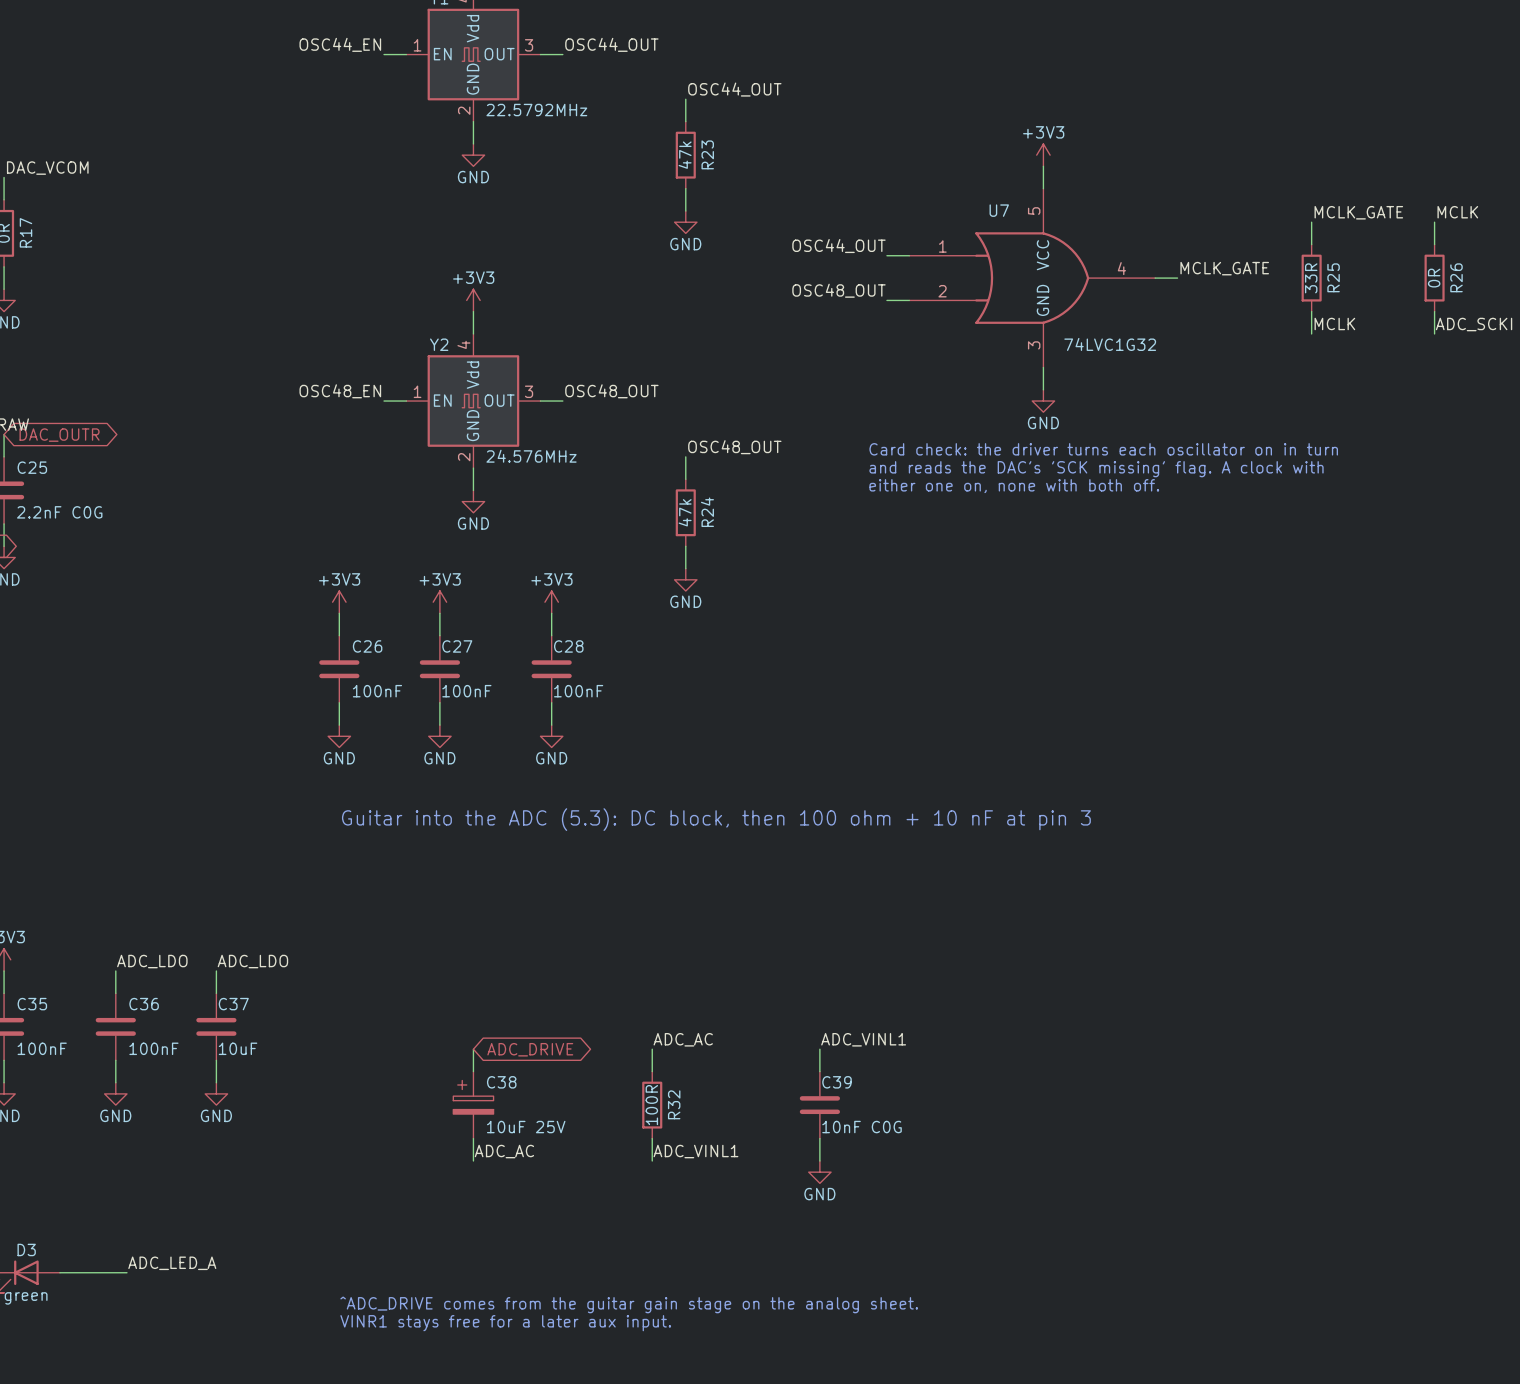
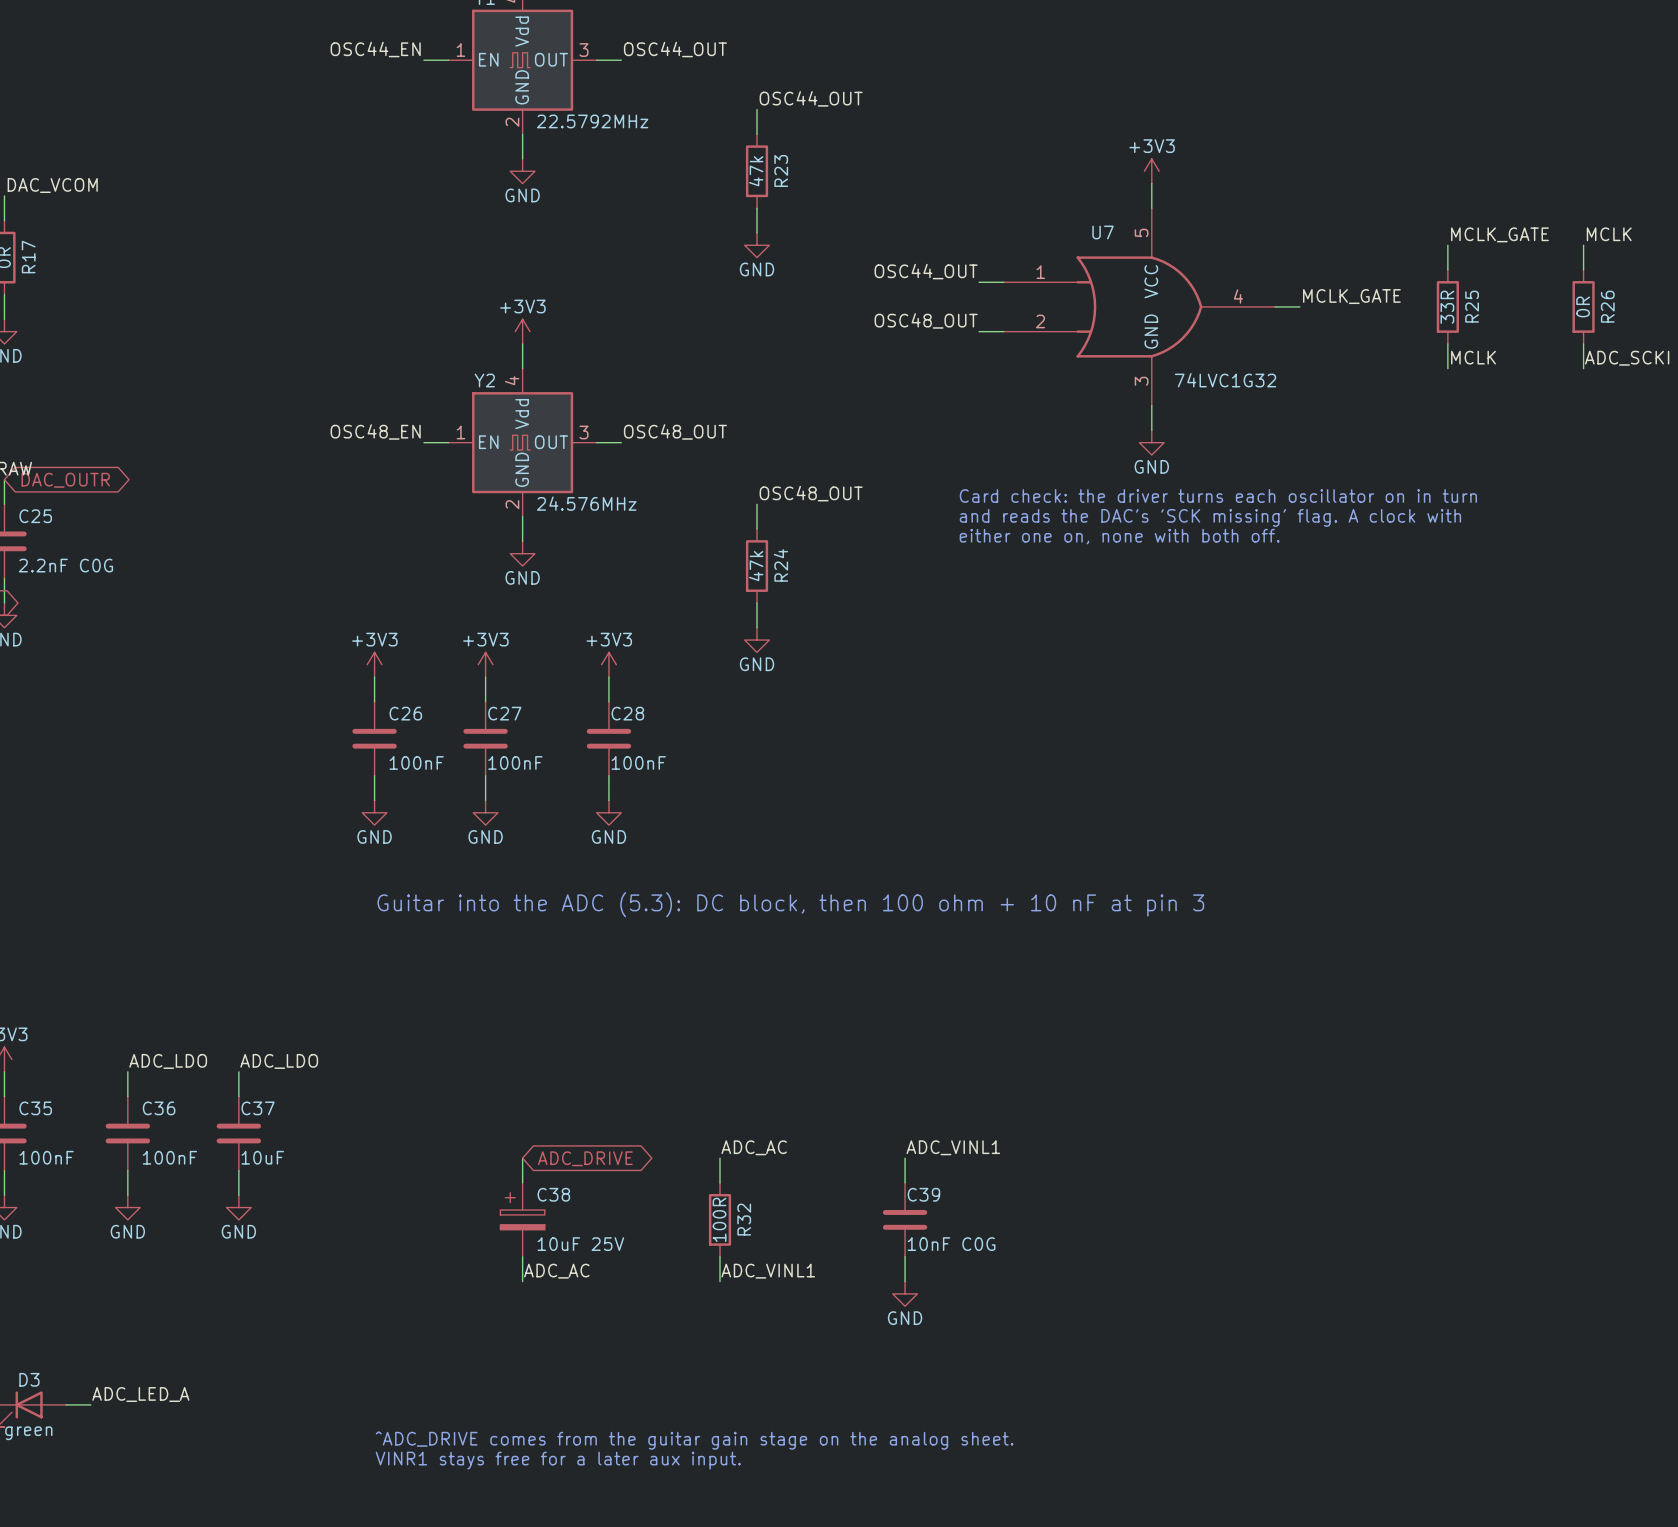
label position: ADC_LED_A (172, 1263) -> ADC_LED_A (140, 1394)
wire: (82, 1272) (126, 1272) -> none

